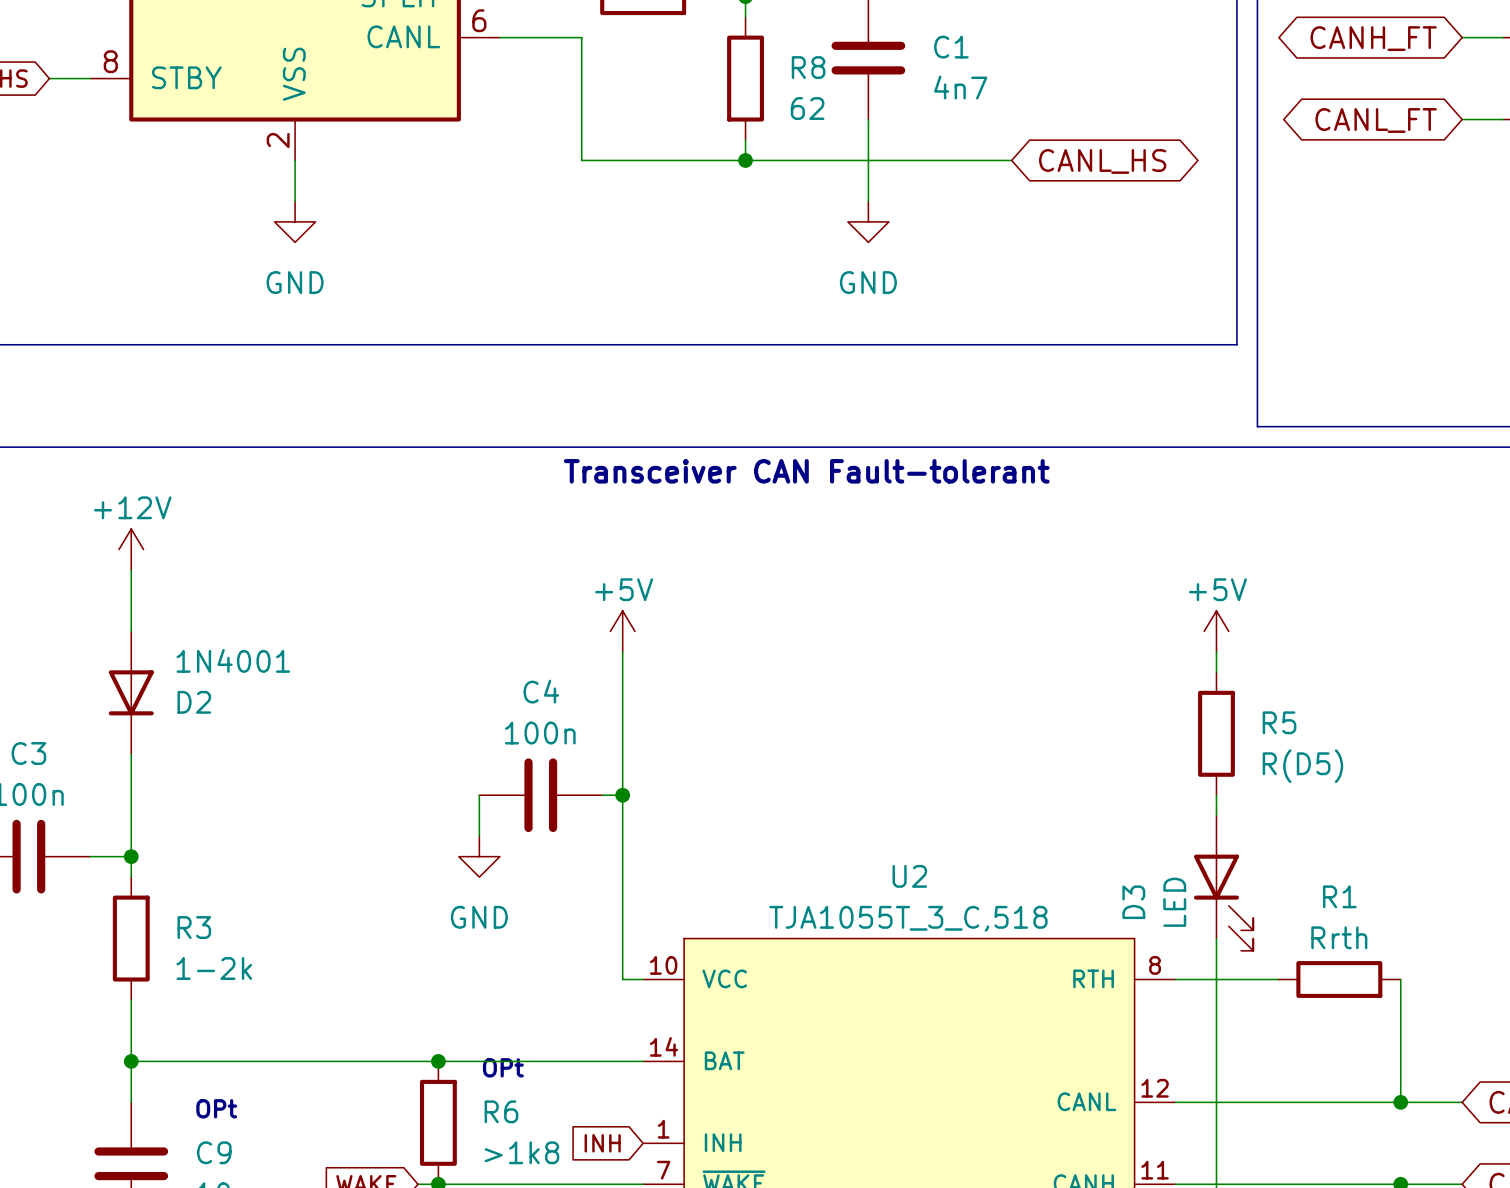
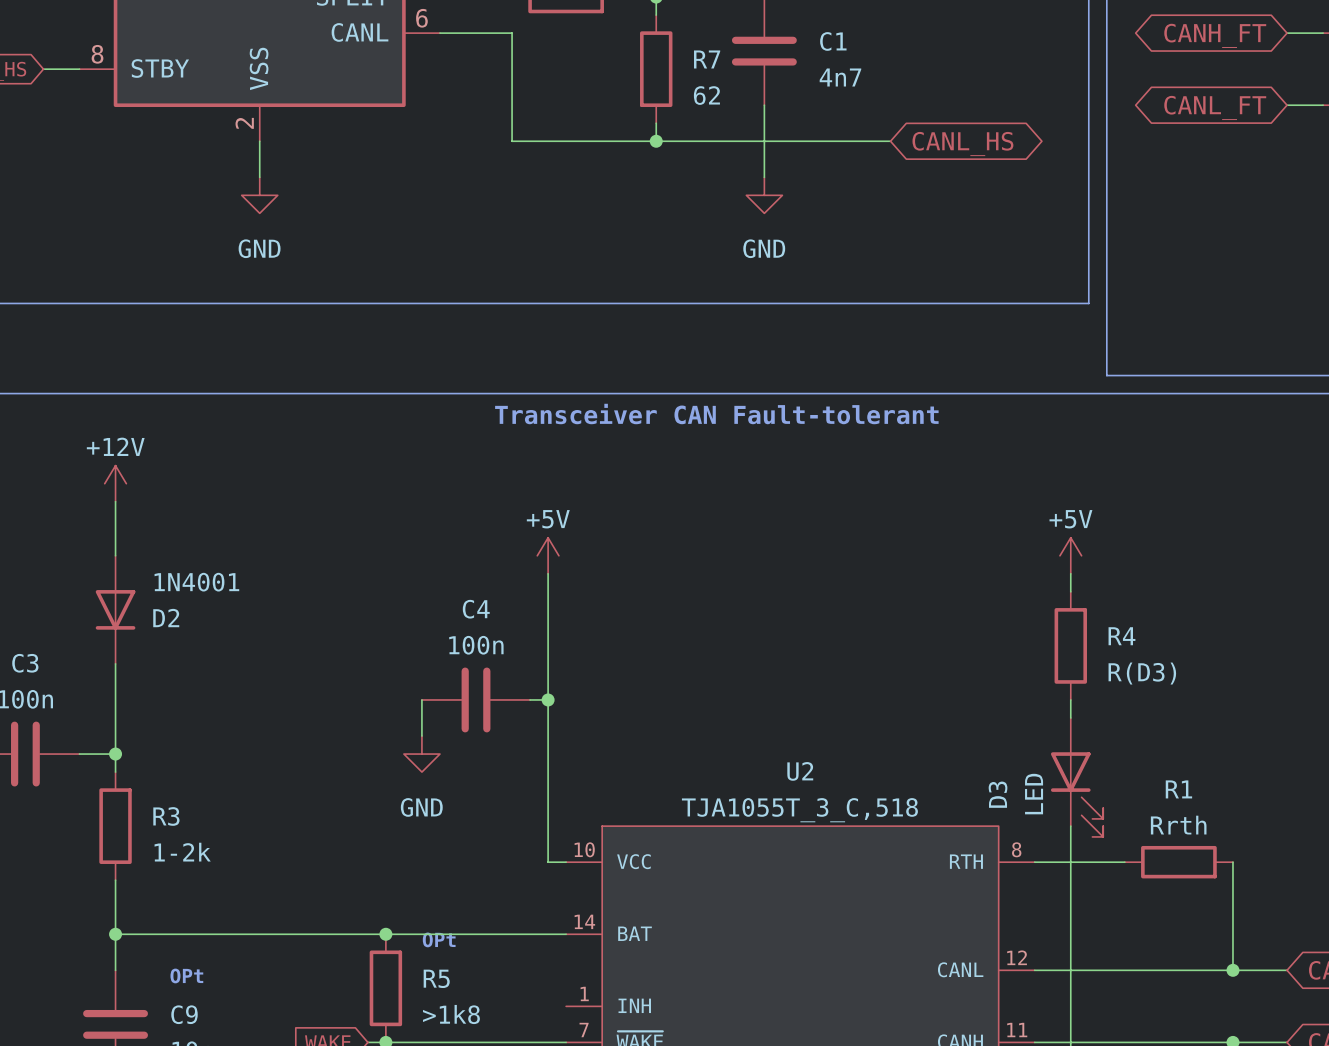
R8 name: R8 (808, 67) -> R7 (707, 59)
R5 name: R5 (1279, 722) -> R4 (1121, 636)
R5 value: R(D5) (1302, 766) -> R(D3) (1142, 673)
R6 name: R6 (501, 1111) -> R5 (436, 978)
global label: INH (602, 1143) -> none

